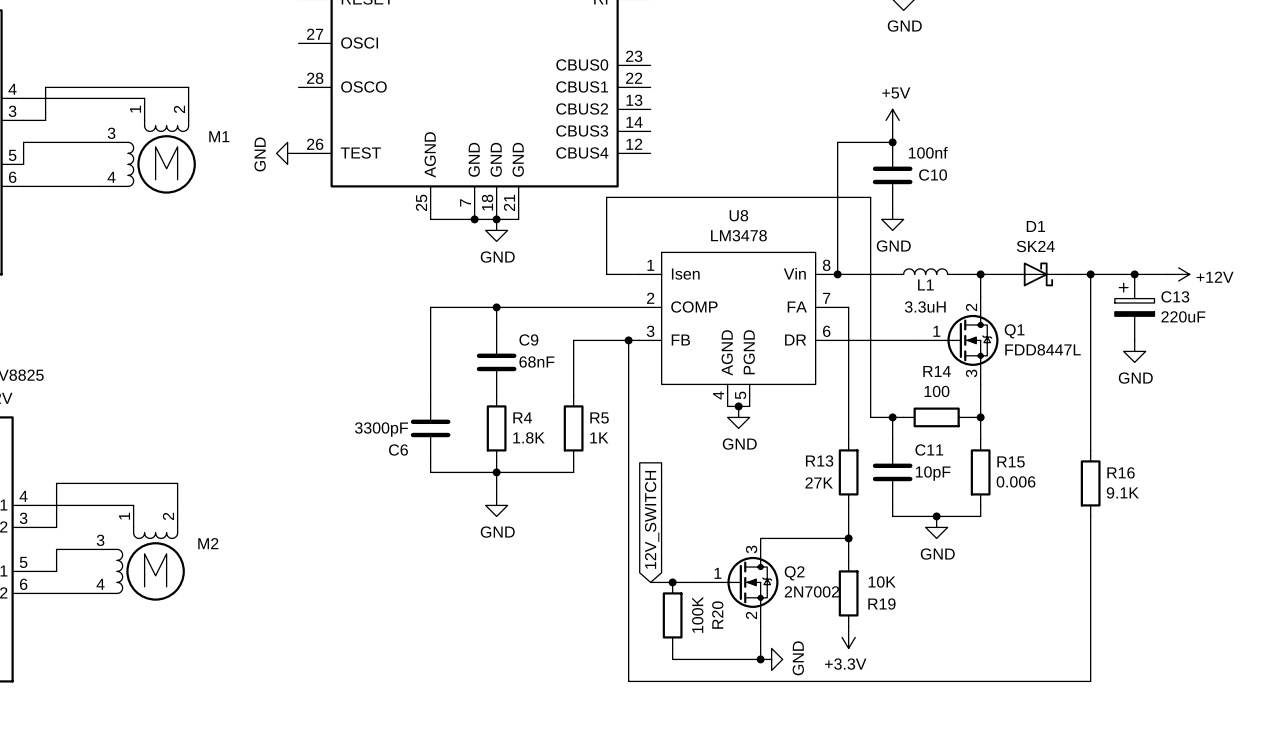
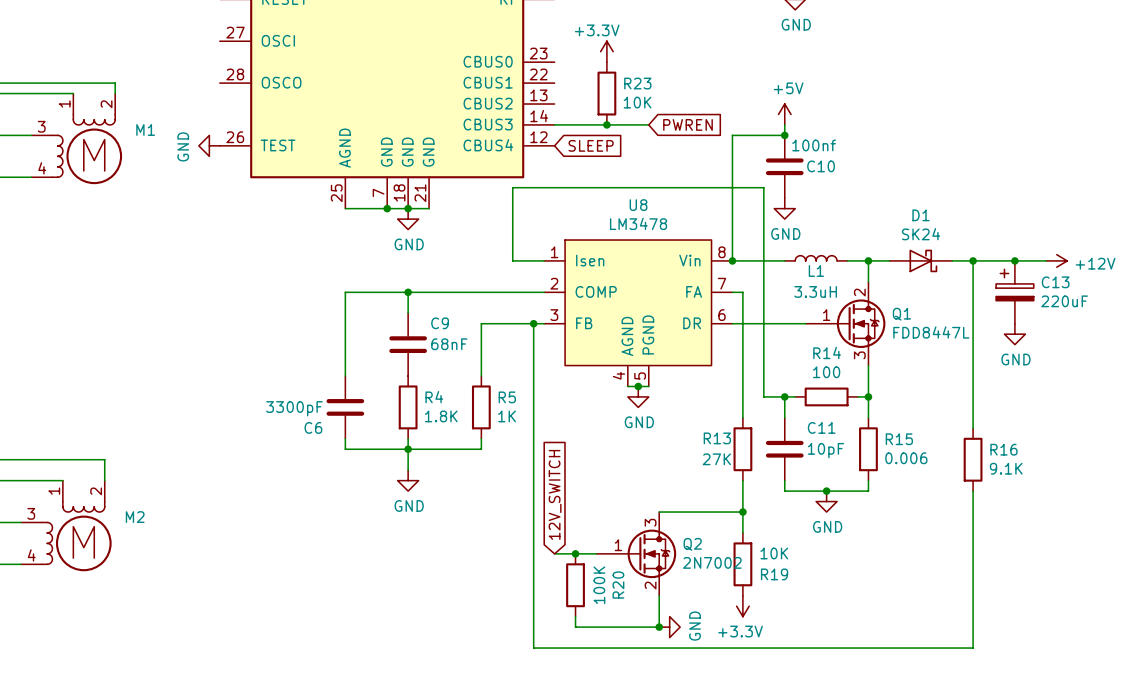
power symbol: none -> +3.3V (606, 51)
R23: none -> 10K (606, 93)
wire: none -> (554, 124) (648, 124)
junction: none -> (606, 124)
global label: none -> PWREN (688, 124)
global label: none -> SLEEP (591, 145)

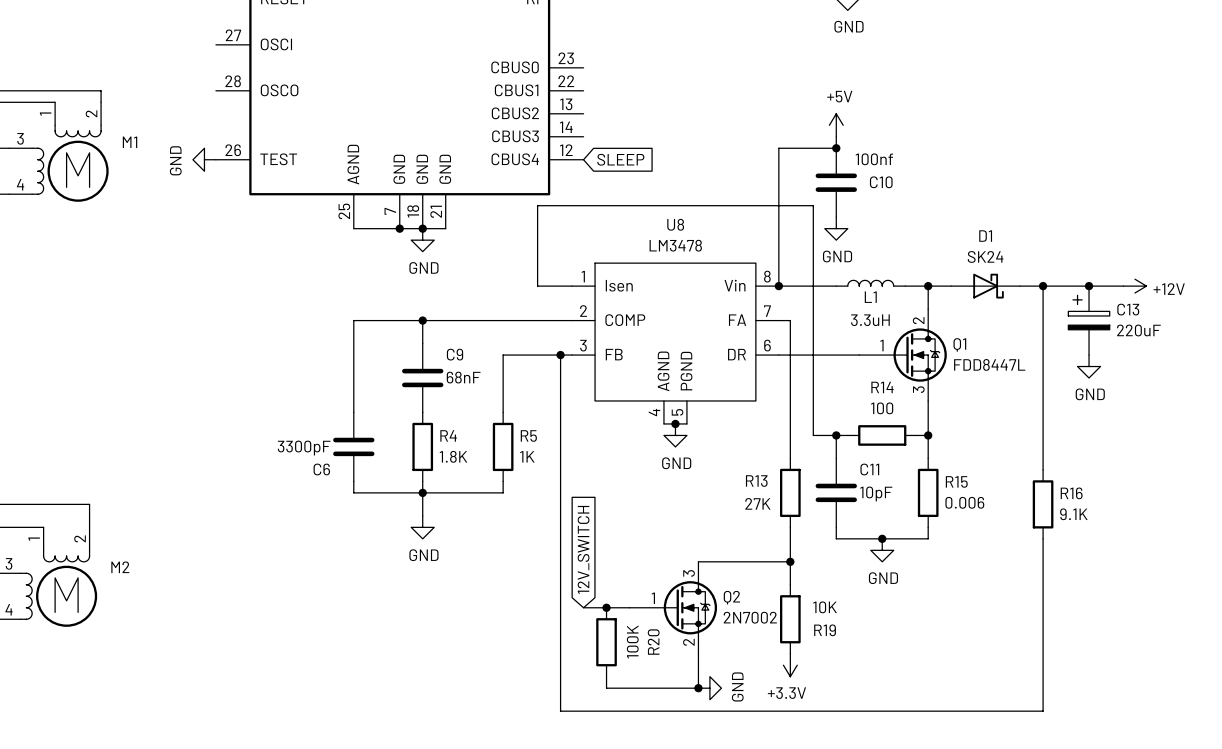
power symbol: +3.3V (606, 51) -> none
R23: 10K (606, 93) -> none
wire: (554, 124) (648, 124) -> none
junction: (606, 124) -> none
global label: PWREN (688, 124) -> none

